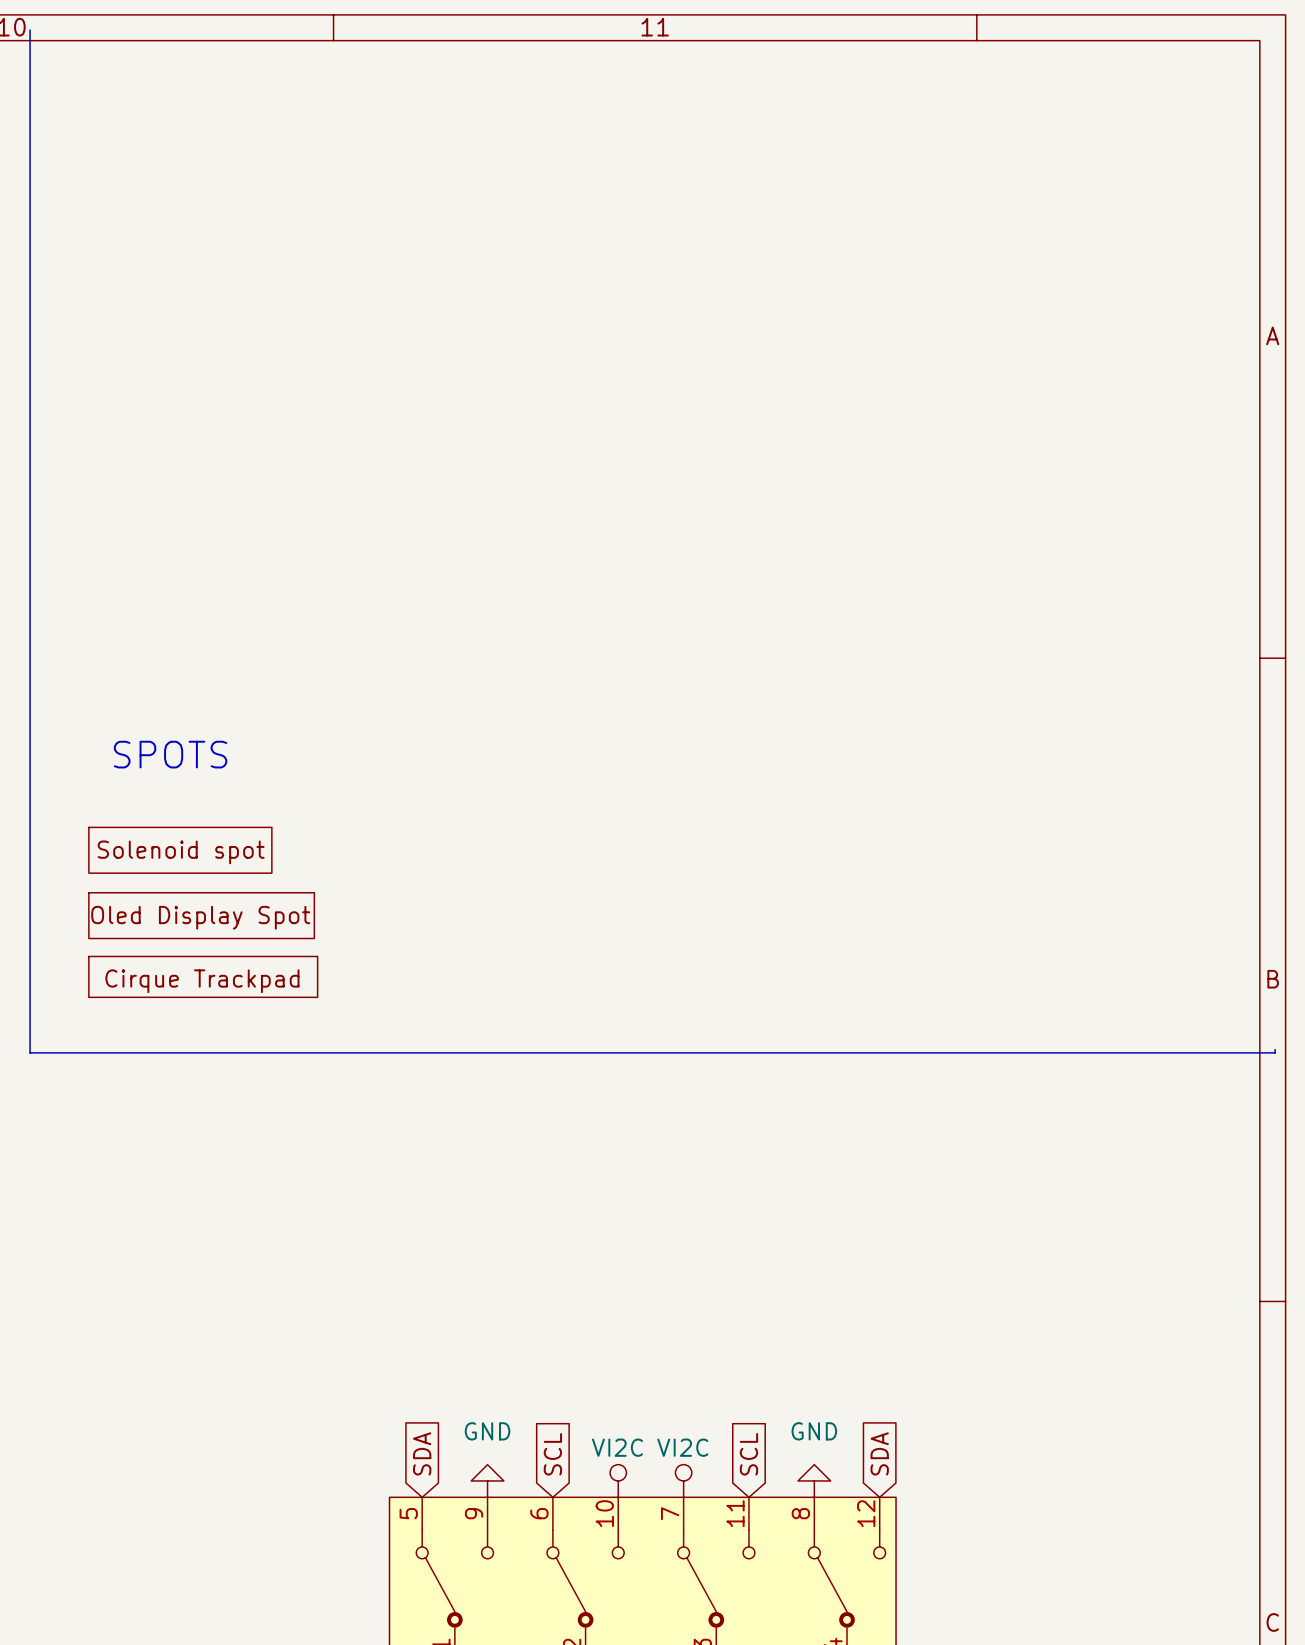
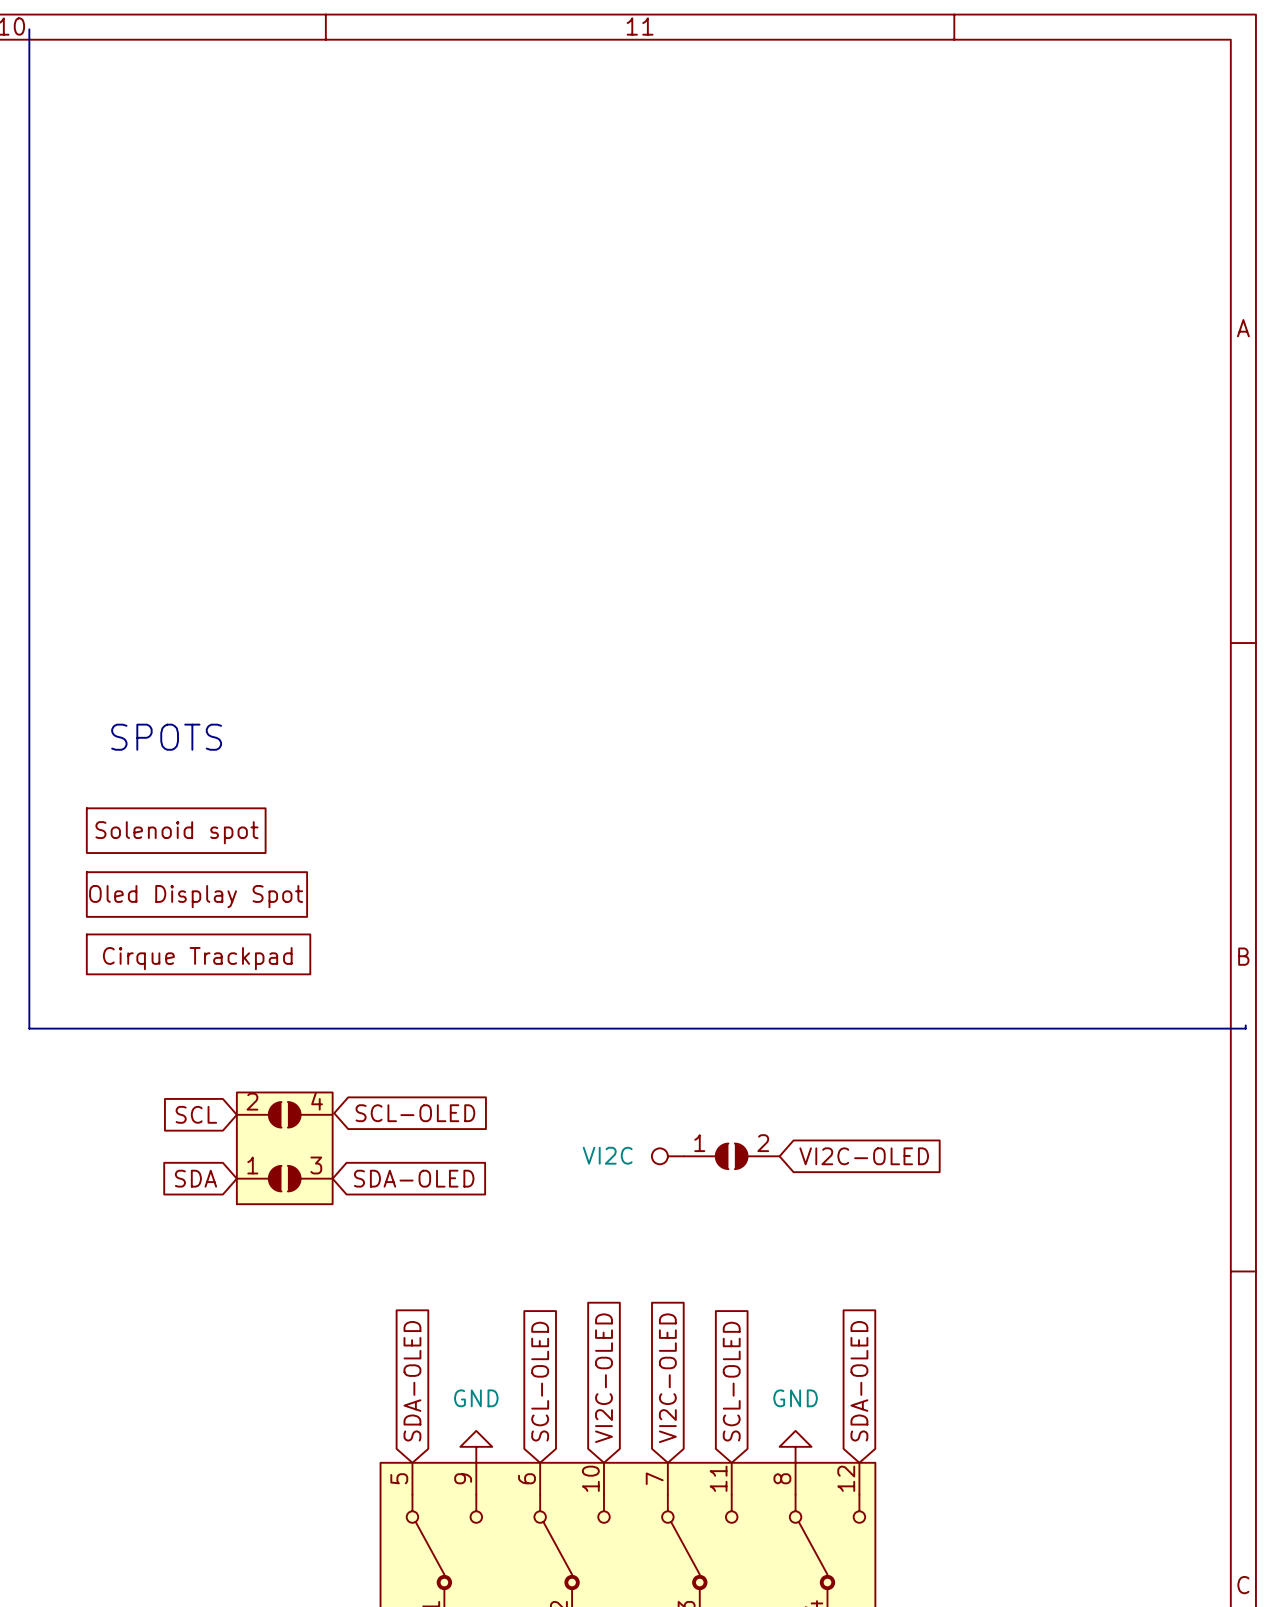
global label: none -> SCL-OLED (415, 1113)
global label: none -> SCL (196, 1114)
part: none -> (284, 1148)
power symbol: none -> VI2C (667, 1156)
part: none -> (731, 1156)
global label: none -> VI2C-OLED (864, 1156)
global label: none -> SDA (195, 1178)
global label: none -> SDA-OLED (414, 1178)
global label: none -> VI2C-OLED (604, 1378)
global label: none -> VI2C-OLED (667, 1378)
global label: SDA (422, 1453) -> SDA-OLED (412, 1381)
global label: SDA (879, 1453) -> SDA-OLED (859, 1381)
global label: SCL (552, 1454) -> SCL-OLED (540, 1381)
global label: SCL (748, 1454) -> SCL-OLED (731, 1381)
power symbol: VI2C (618, 1480) -> none
power symbol: VI2C (683, 1480) -> none

